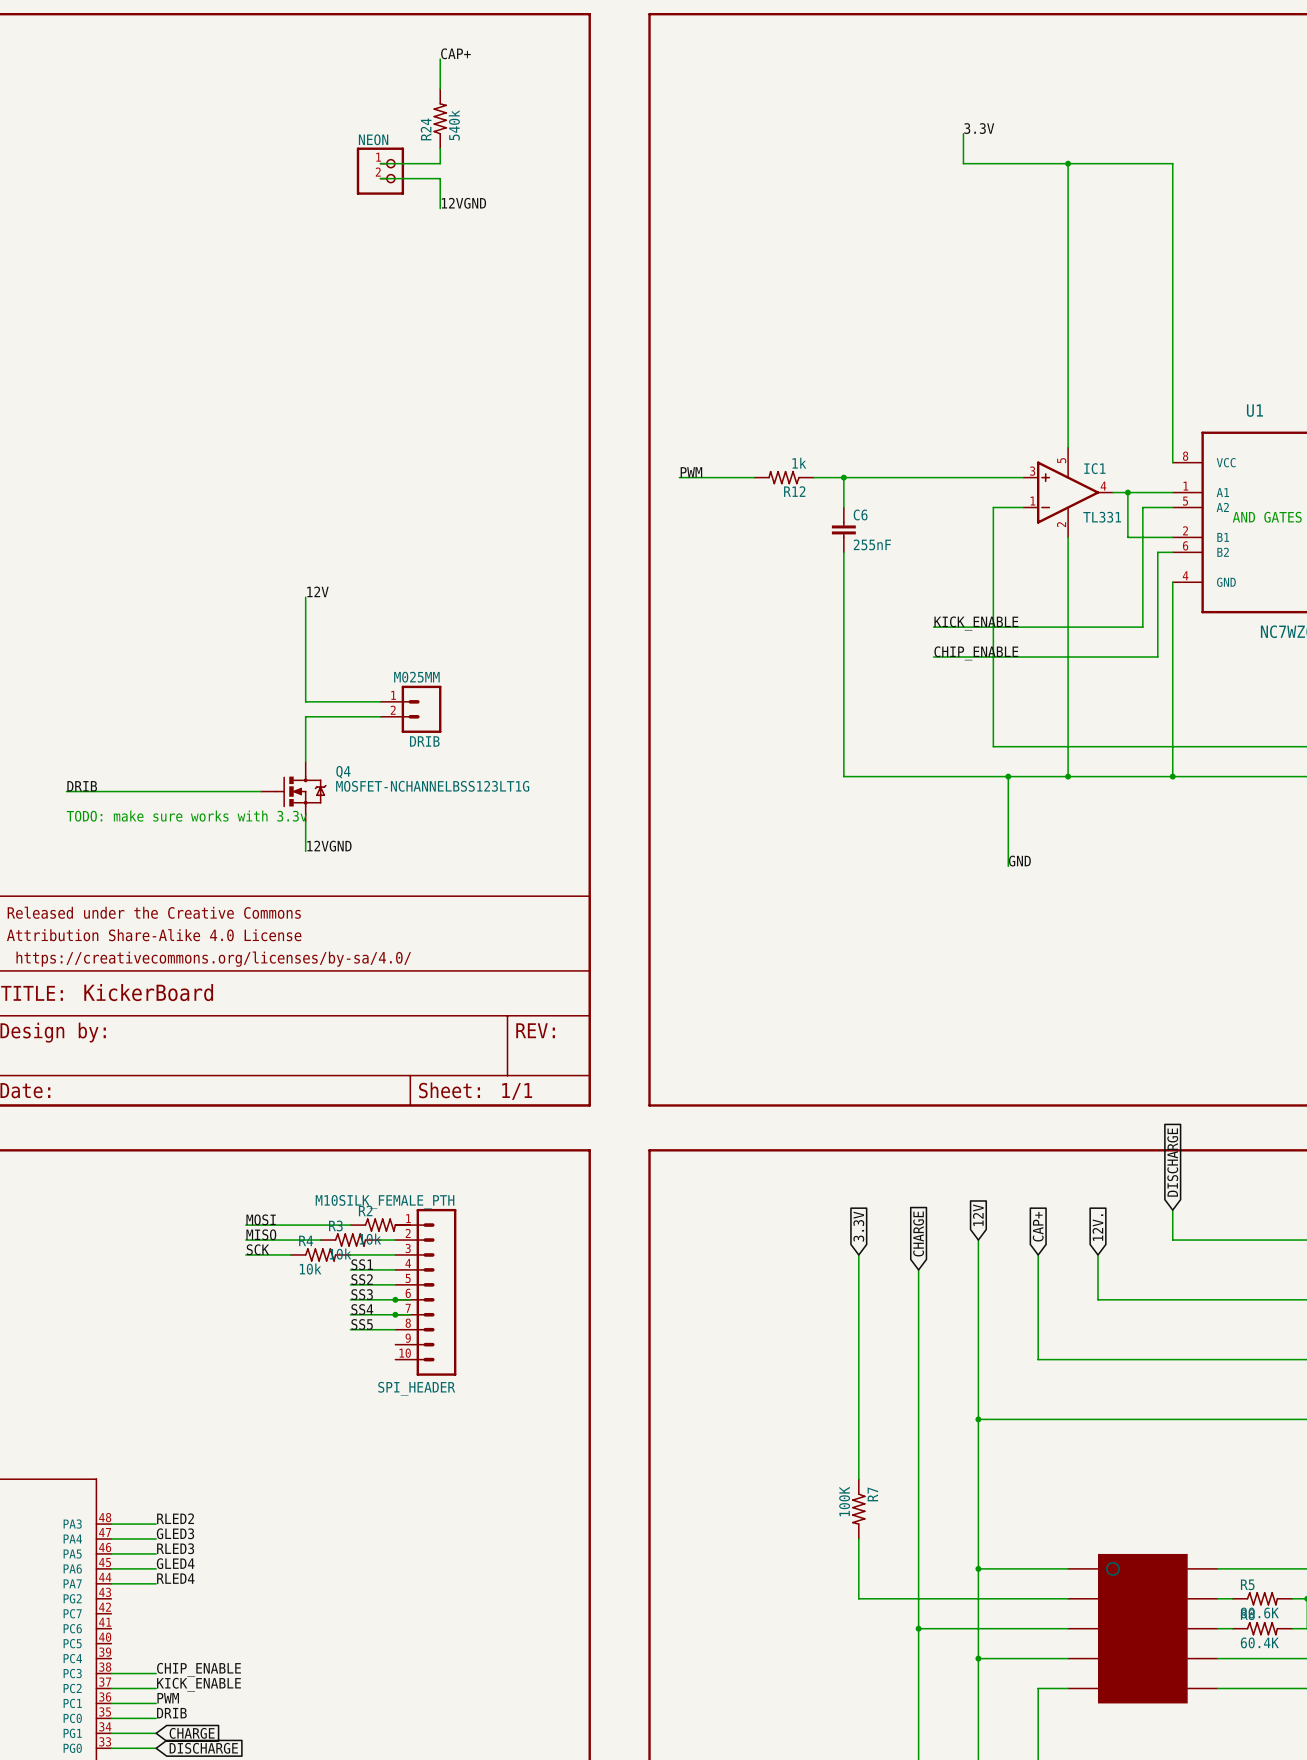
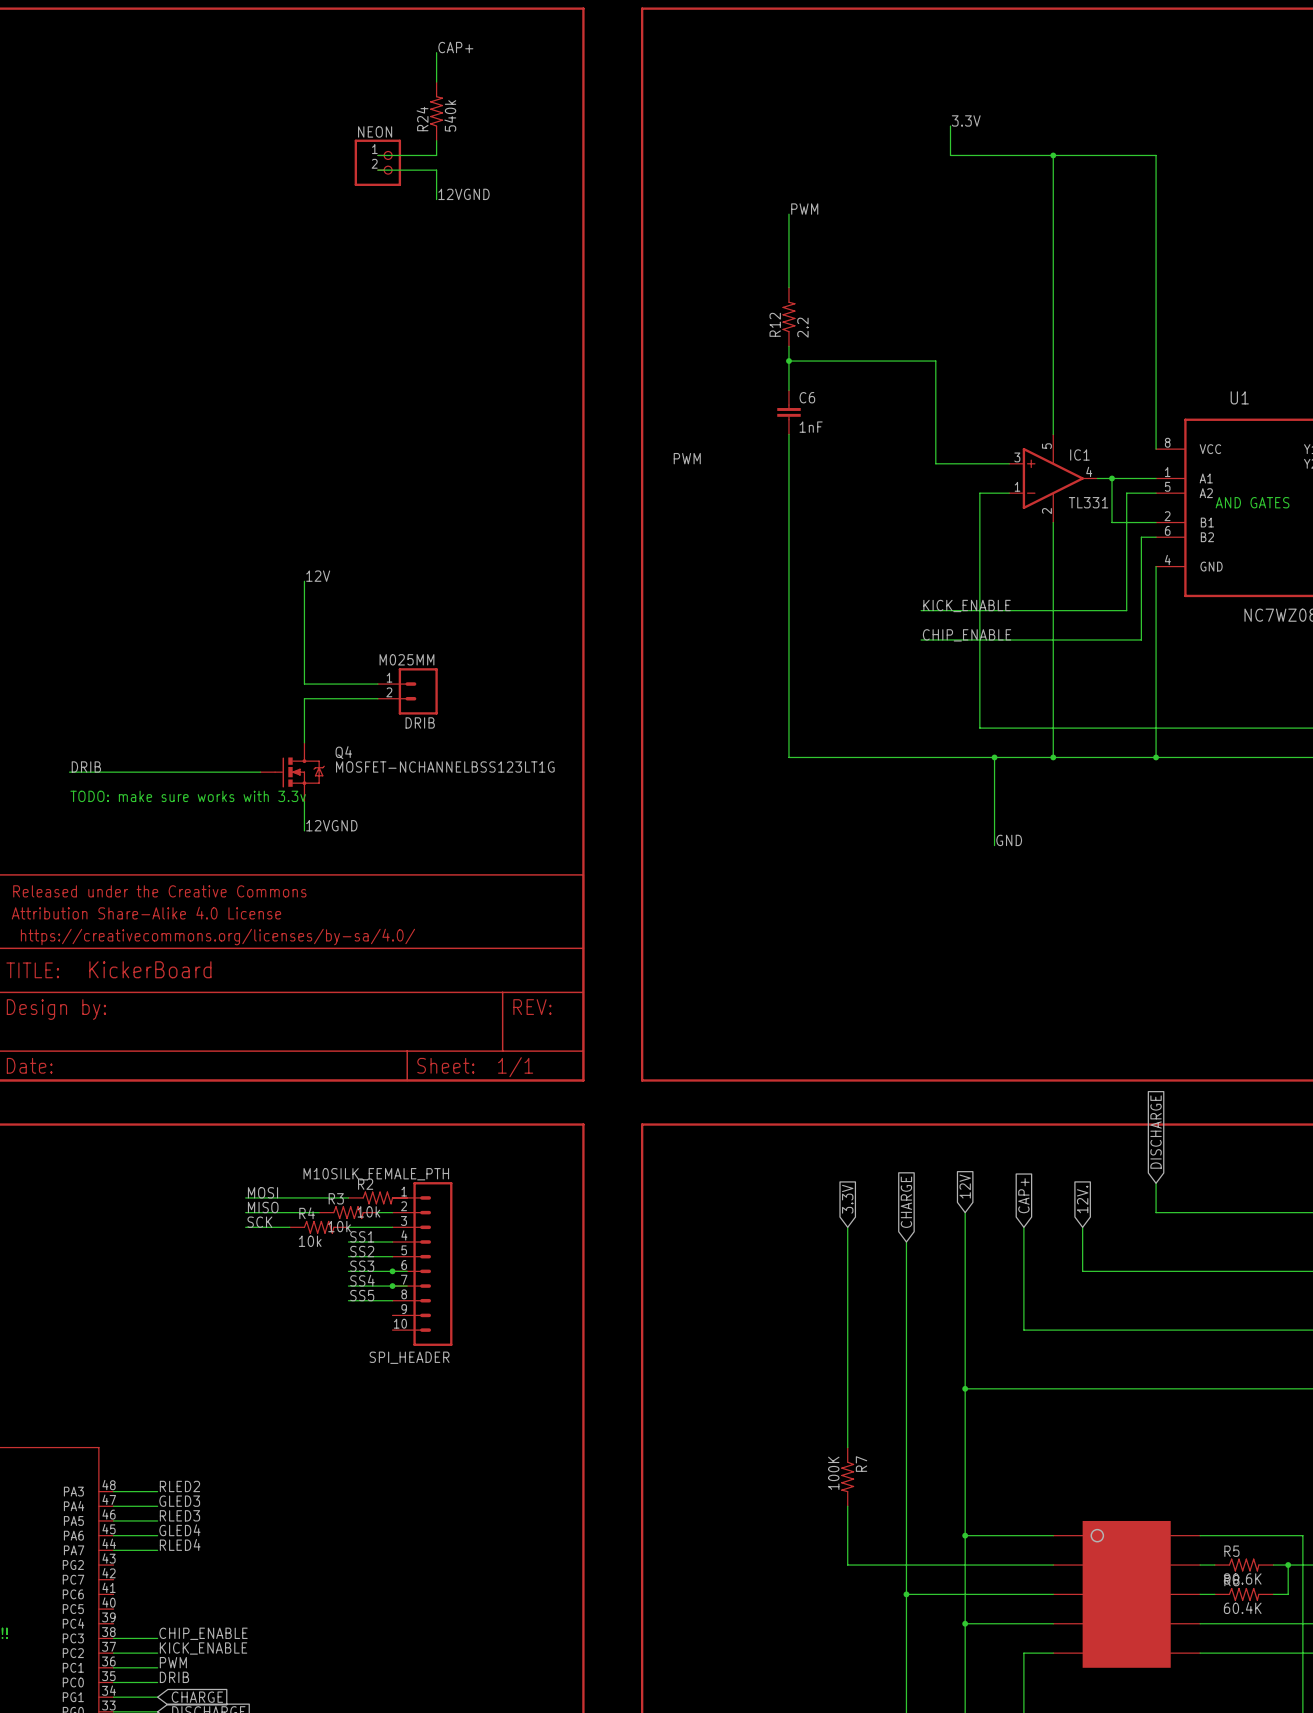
label: none -> PWM (804, 209)
wire: none -> (788, 214) (788, 287)
wire: none -> (788, 346) (788, 390)
junction: none -> (788, 361)
R12 value: 1k (799, 463) -> 2.2 (802, 327)
wire: (679, 477) (754, 477) -> none
R12 rotation: 0° (784, 477) -> 90° clockwise (788, 316)
R12 position: (784, 477) -> (788, 316)
wire: (813, 477) (948, 477) -> (788, 361) (935, 361) (935, 463)
wire: (843, 477) (843, 507) -> none
junction: (843, 477) -> none
C6 position: (843, 529) -> (788, 412)
C6 value: 255nF (872, 544) -> 1nF (811, 427)
wire: (843, 552) (843, 776) -> (788, 434) (788, 757) (833, 757)

